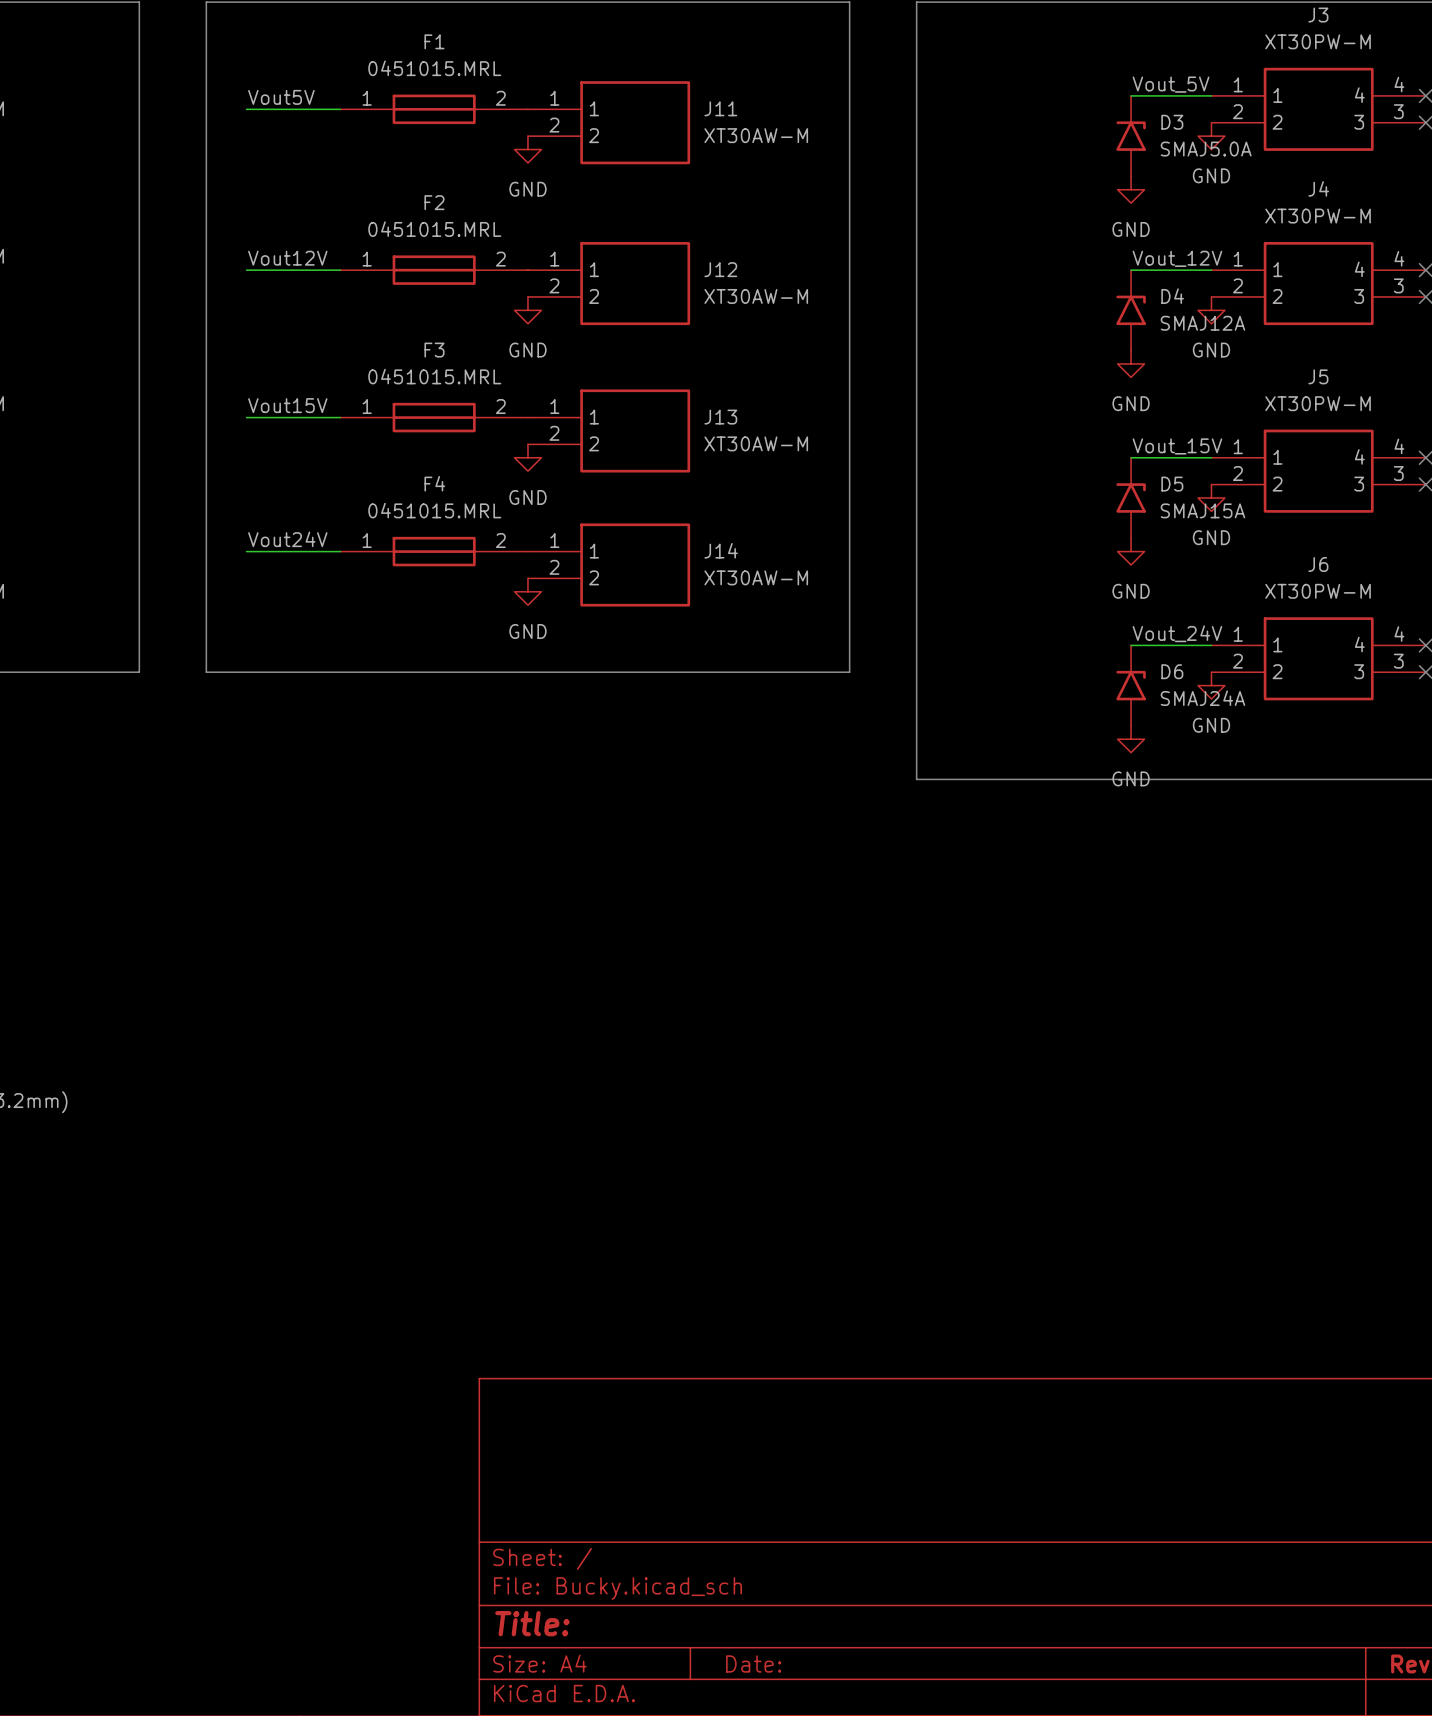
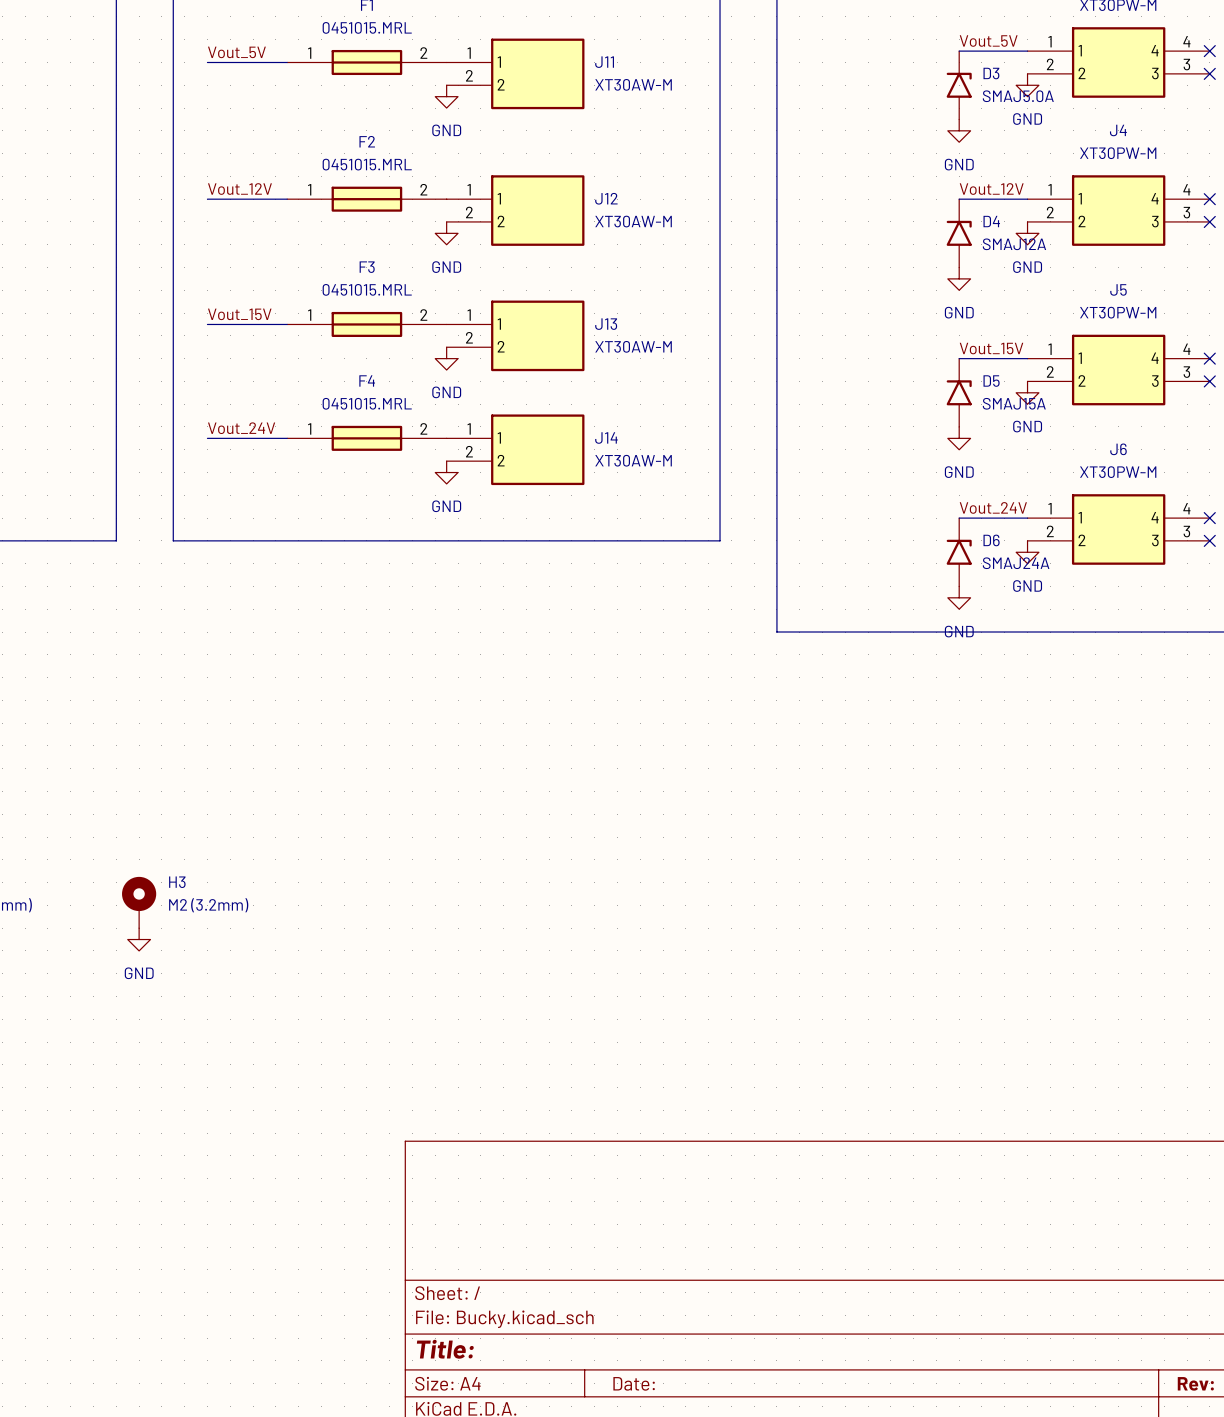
label: Vout5V (281, 97) -> Vout_5V (236, 52)
label: Vout12V (287, 258) -> Vout_12V (239, 189)
label: Vout15V (287, 405) -> Vout_15V (239, 314)
label: Vout24V (287, 539) -> Vout_24V (241, 428)
H3: none -> M2 (3.2mm) (139, 902)
power symbol: none -> GND (139, 939)

